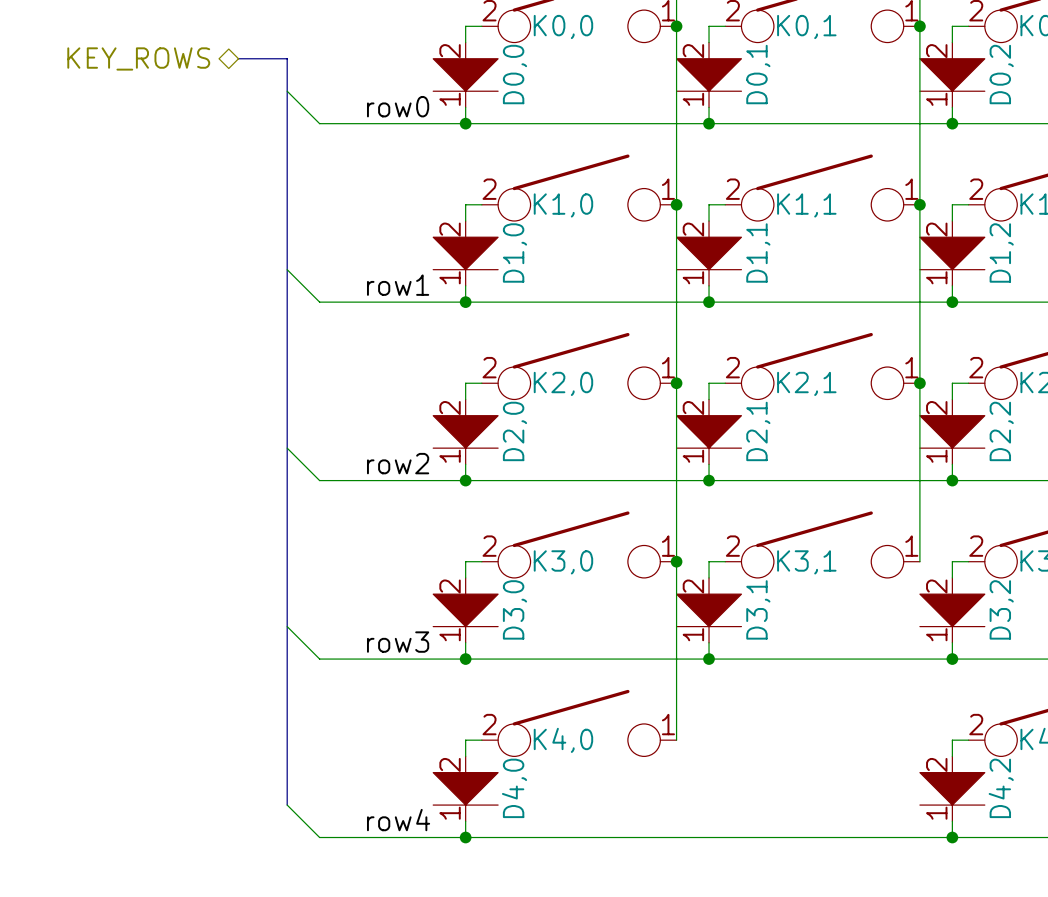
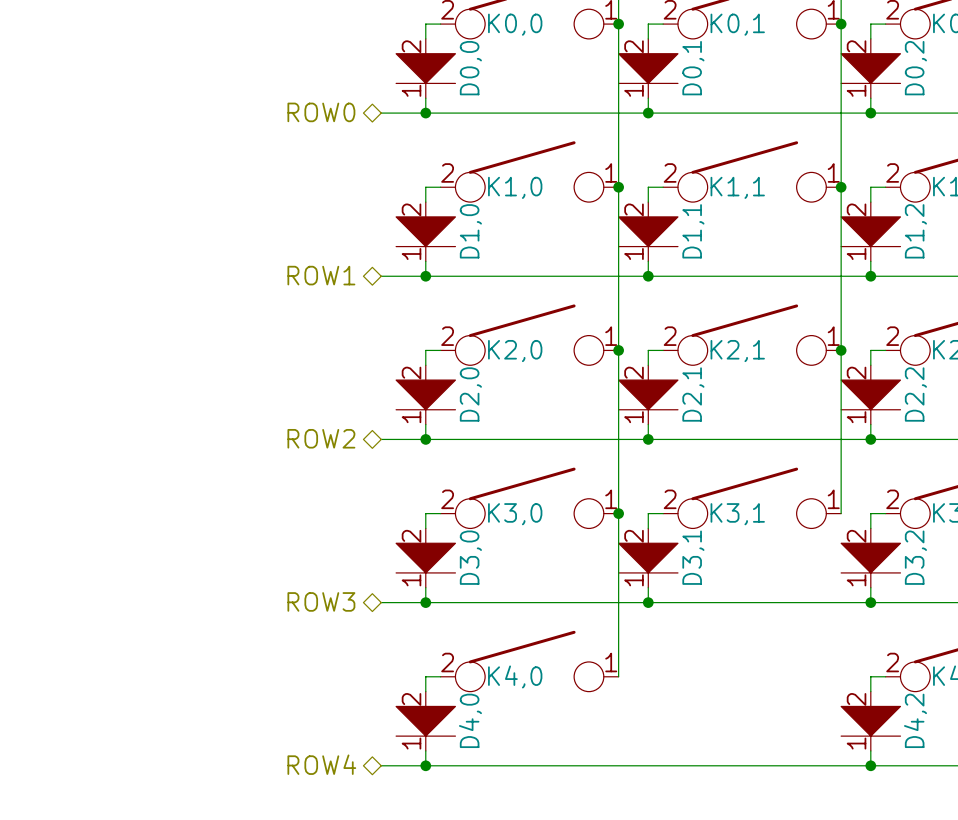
hierarchical label: KEY_ROWS (138, 58) -> none
bus: (238, 58) (287, 58) (287, 805) -> none
wire: (287, 91) (319, 123) (416, 123) -> none
label: row0 (398, 106) -> none
hierarchical label: none -> ROW0 (321, 112)
wire: (287, 269) (319, 302) (416, 302) -> none
label: row1 (398, 285) -> none
hierarchical label: none -> ROW1 (321, 275)
wire: (287, 448) (319, 480) (416, 480) -> none
label: row2 (398, 463) -> none
hierarchical label: none -> ROW2 (321, 438)
wire: (287, 626) (319, 659) (416, 659) -> none
label: row3 (398, 642) -> none
hierarchical label: none -> ROW3 (321, 601)
wire: (287, 805) (319, 837) (416, 837) -> none
label: row4 (398, 820) -> none
hierarchical label: none -> ROW4 (321, 764)

